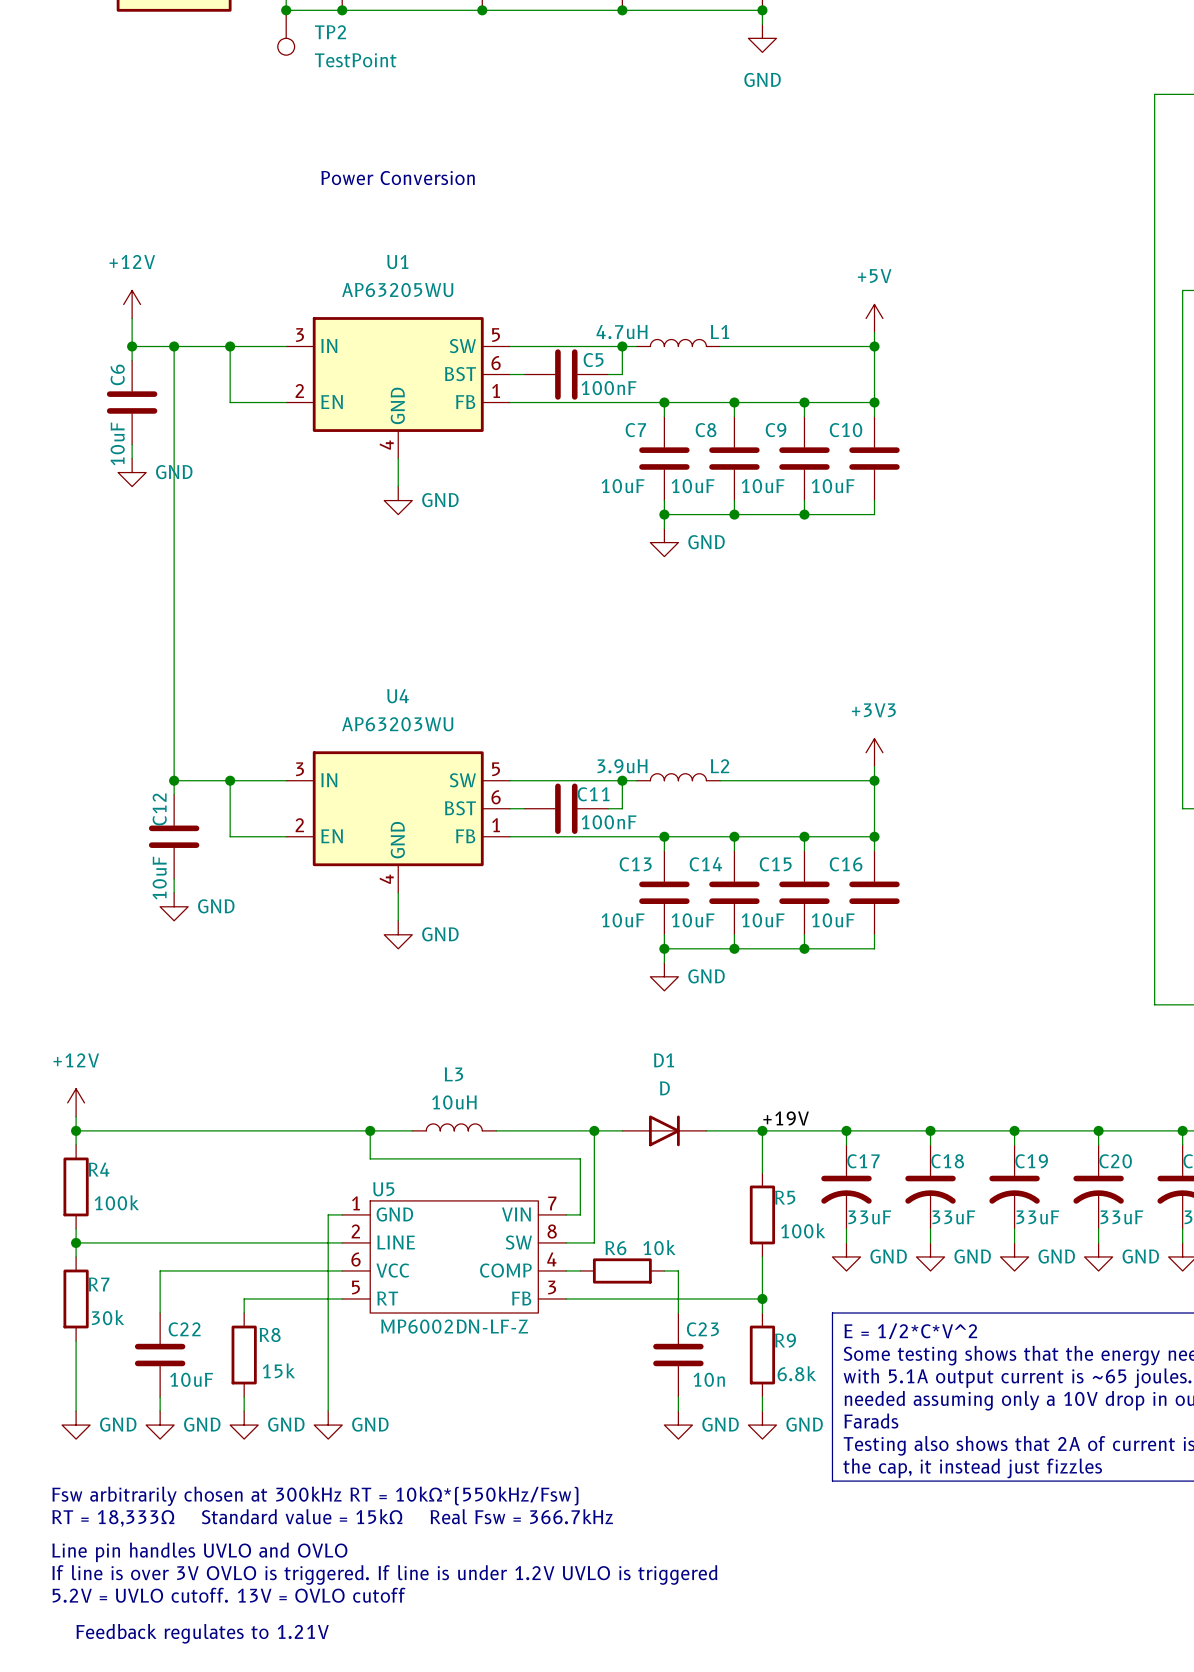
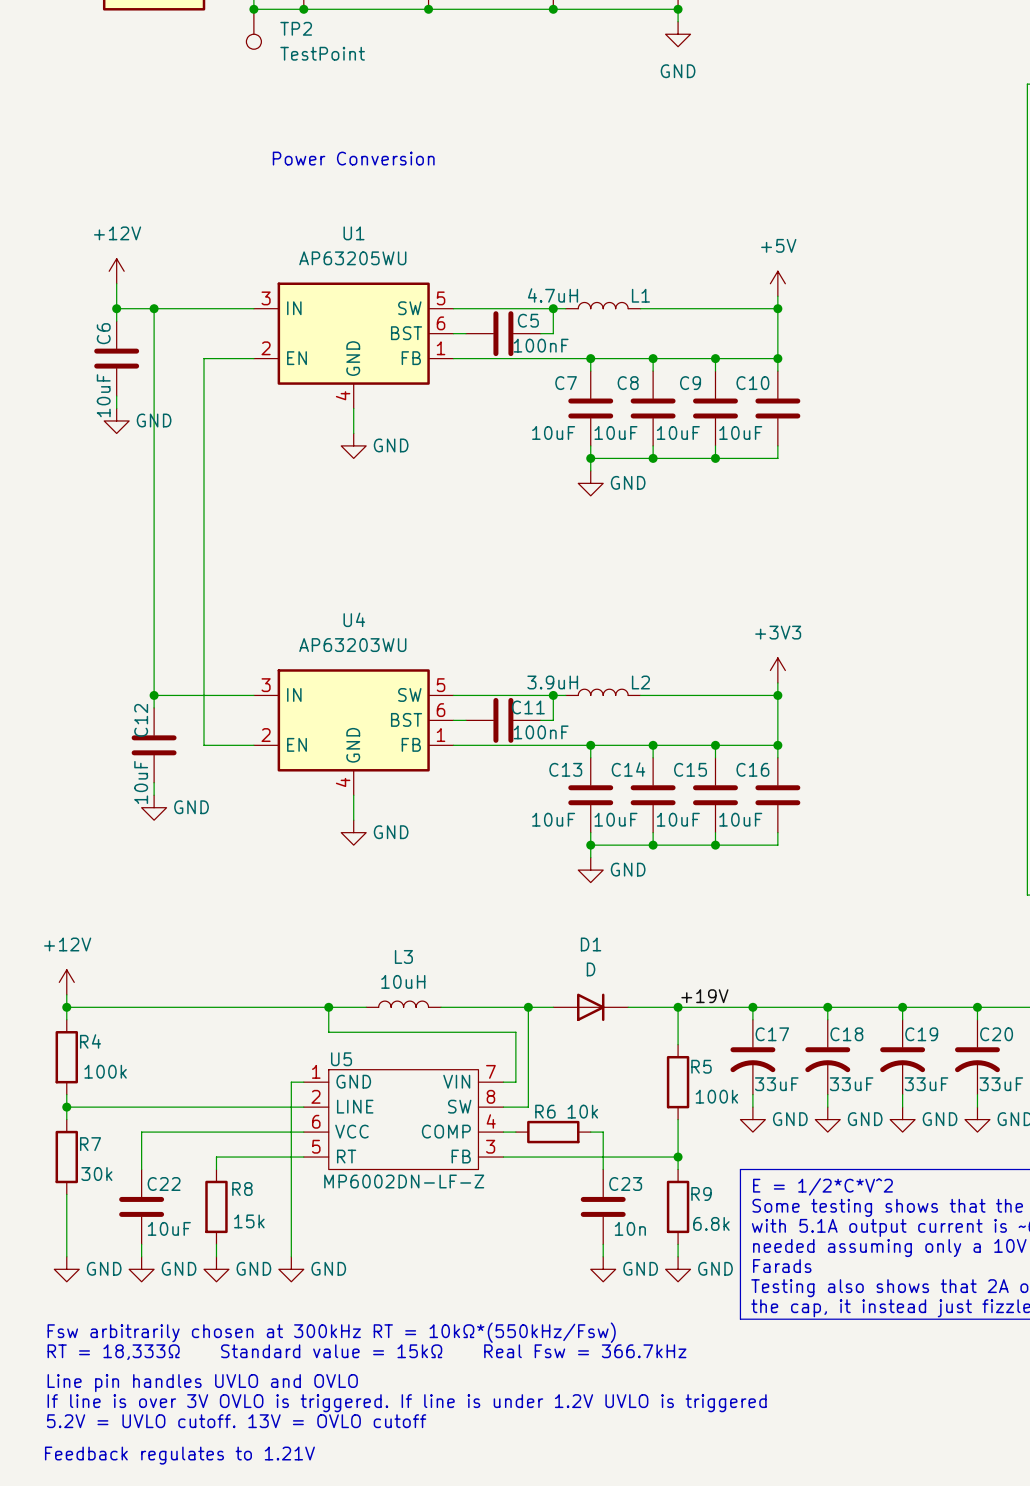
wire: (230, 346) (230, 402) -> (204, 695) (204, 358)
junction: (230, 346) -> none
junction: (230, 780) -> none

